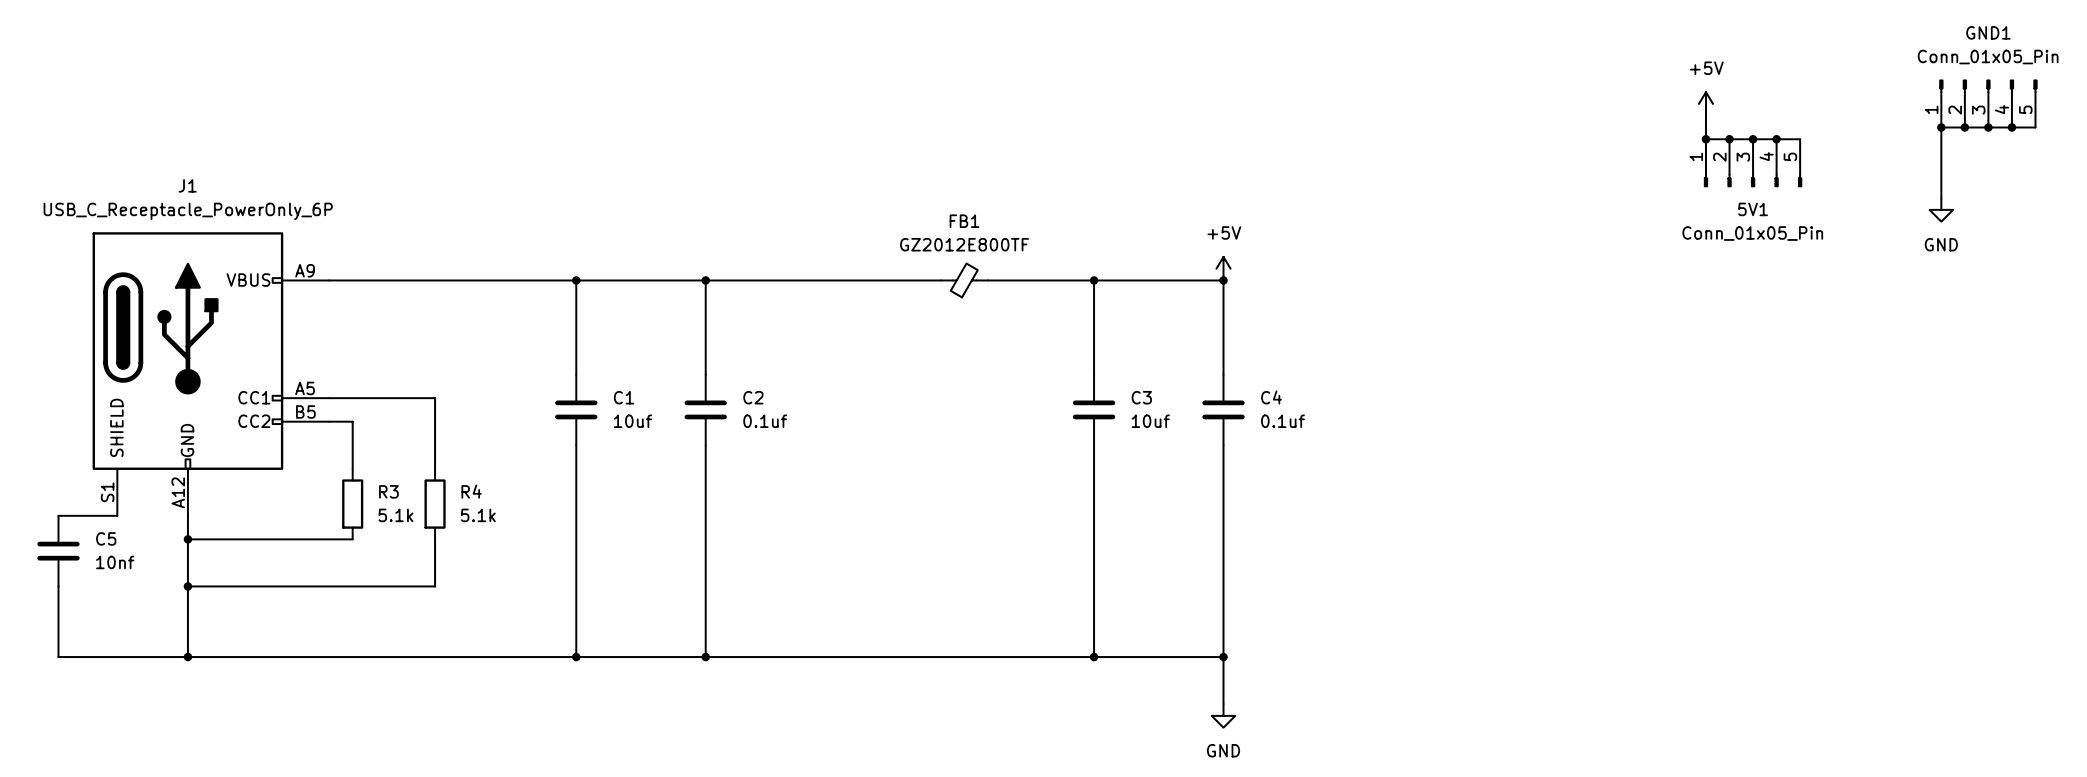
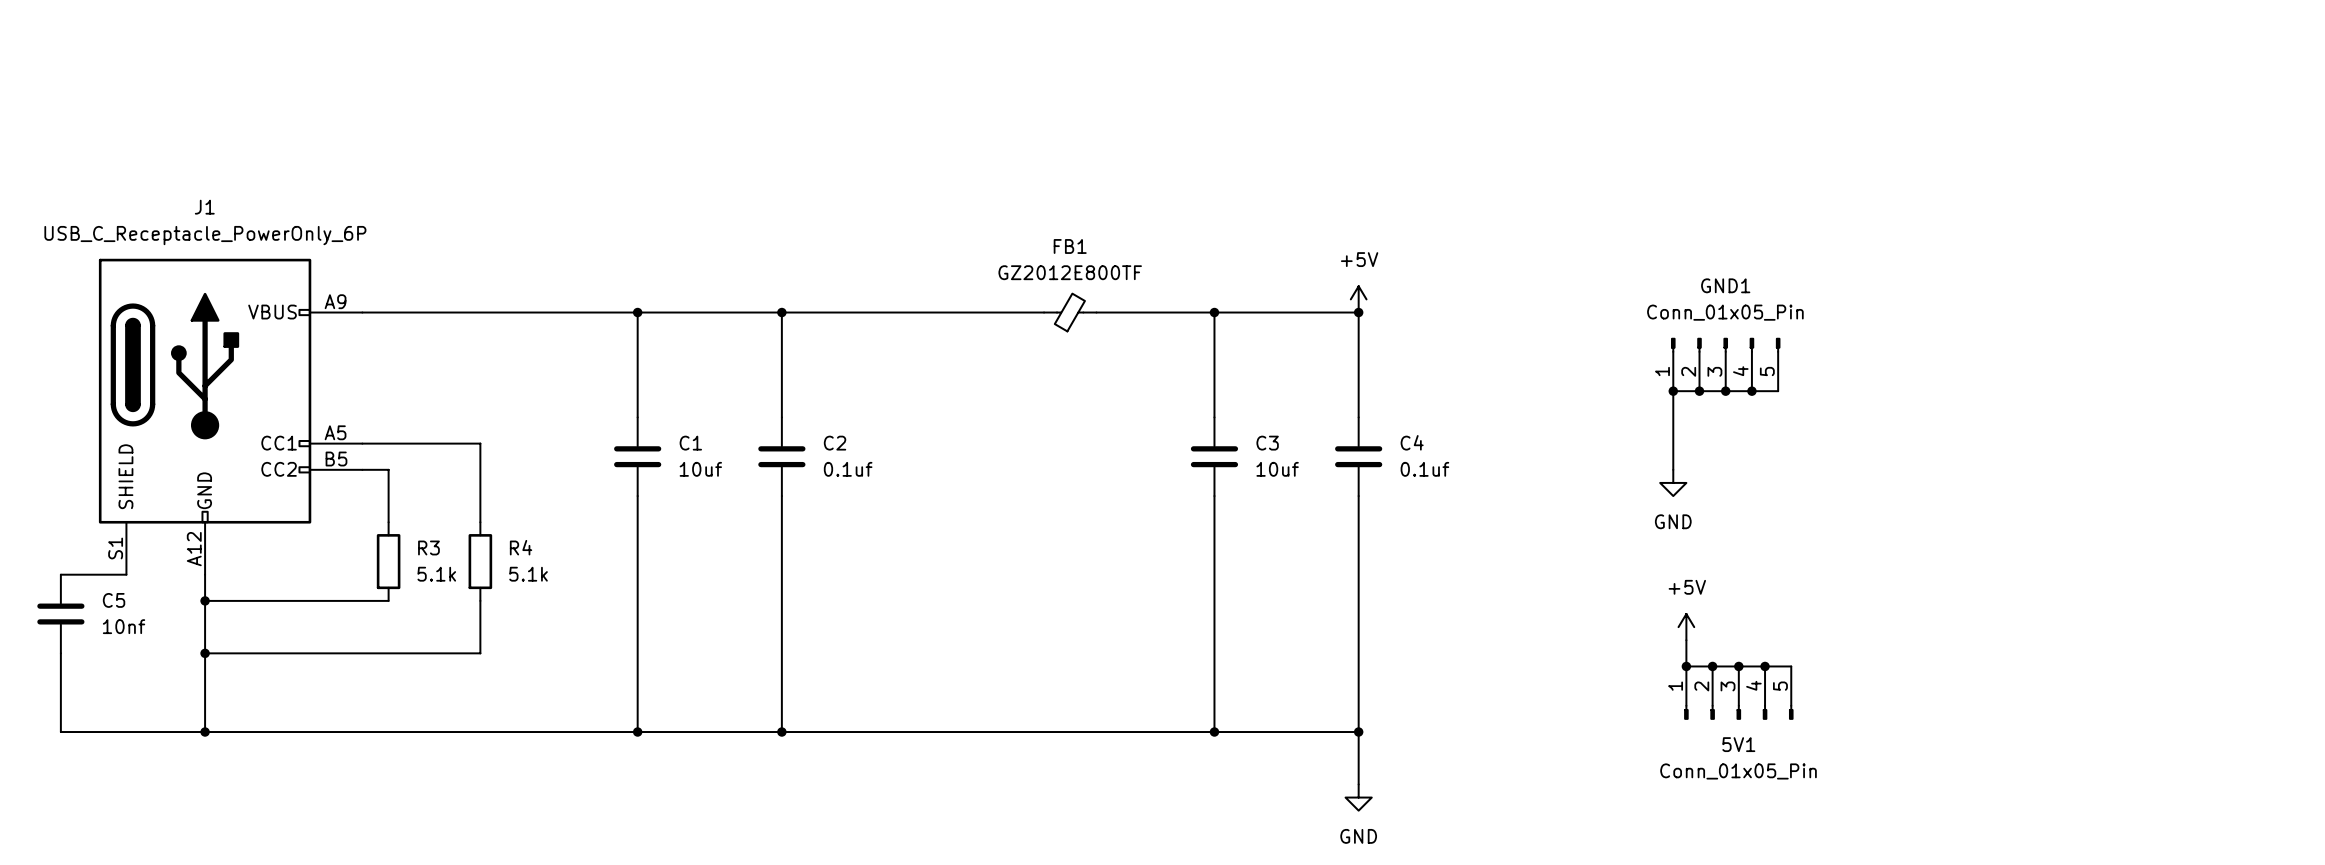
power symbol: +5V (1705, 103) -> none
GND1 position: (1988, 103) -> (1725, 364)
wire: (1705, 115) (1705, 139) (1800, 139) -> none
junction: (1941, 127) -> none
junction: (1964, 127) -> none
junction: (1988, 127) -> none
junction: (2011, 127) -> none
wire: (2035, 127) (1941, 127) (1941, 198) -> none
junction: (1705, 139) -> none
junction: (1729, 139) -> none
junction: (1753, 139) -> none
junction: (1776, 139) -> none
5V1 position: (1753, 163) -> (1738, 693)
power symbol: GND (1941, 209) -> none
junction: none -> (1673, 391)
junction: none -> (1699, 391)
junction: none -> (1725, 391)
junction: none -> (1751, 391)
wire: none -> (1778, 391) (1673, 391) (1673, 469)
power symbol: none -> GND (1673, 482)
power symbol: none -> +5V (1686, 627)
wire: none -> (1686, 640) (1686, 666) (1791, 666)
junction: none -> (1686, 666)
junction: none -> (1712, 666)
junction: none -> (1738, 666)
junction: none -> (1765, 666)

